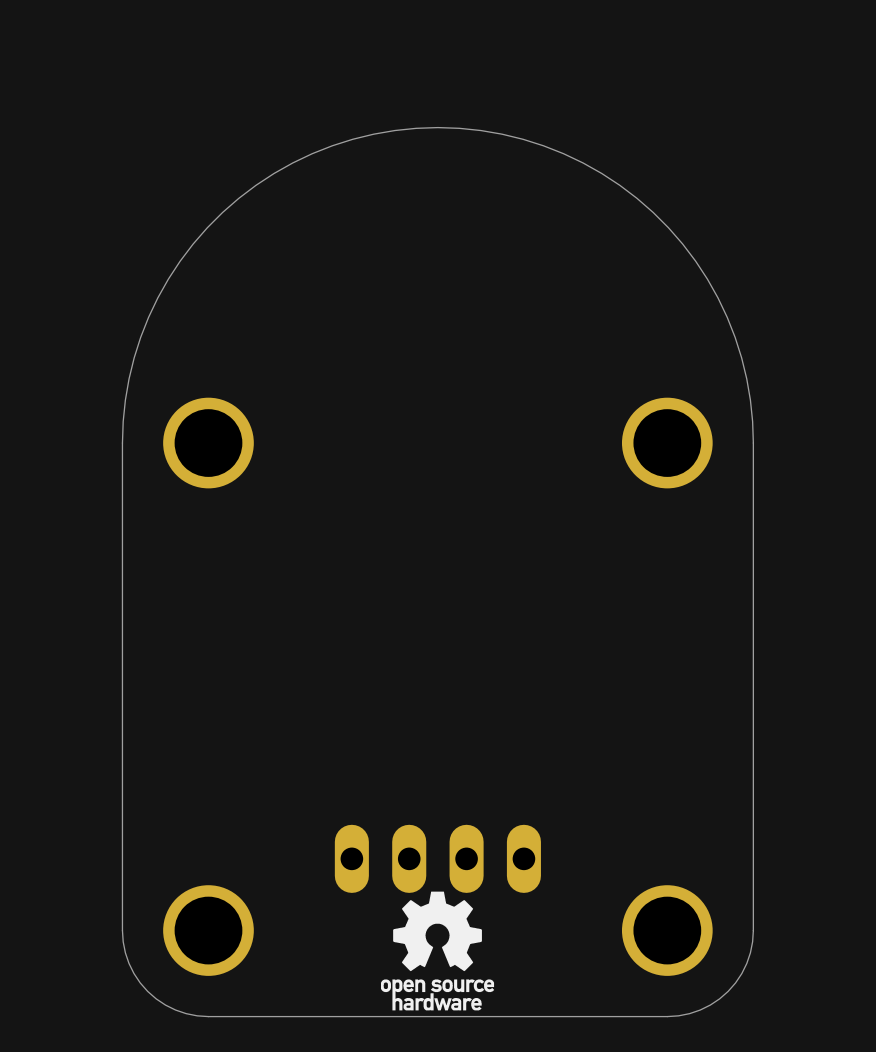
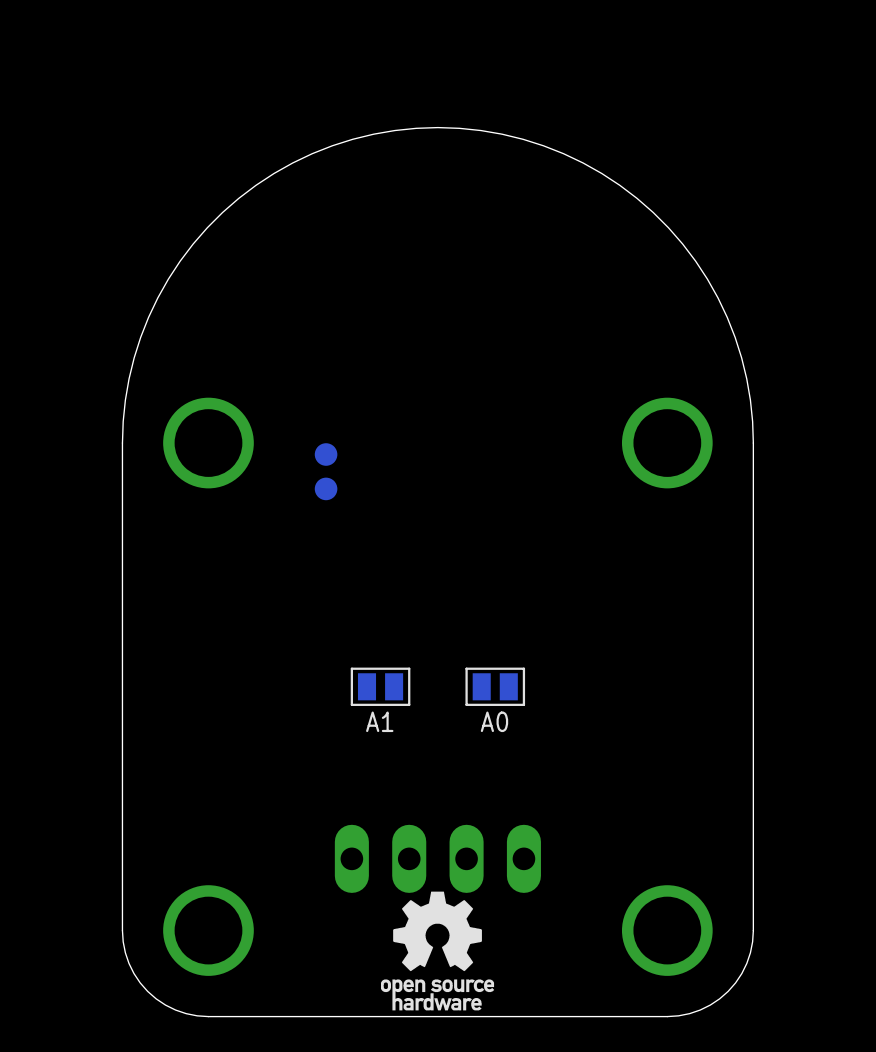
part: none -> (326, 454)
part: none -> (326, 488)
part: none -> (380, 686)
part: none -> (495, 686)
text: none -> A1 (379, 721)
text: none -> A0 (494, 721)

